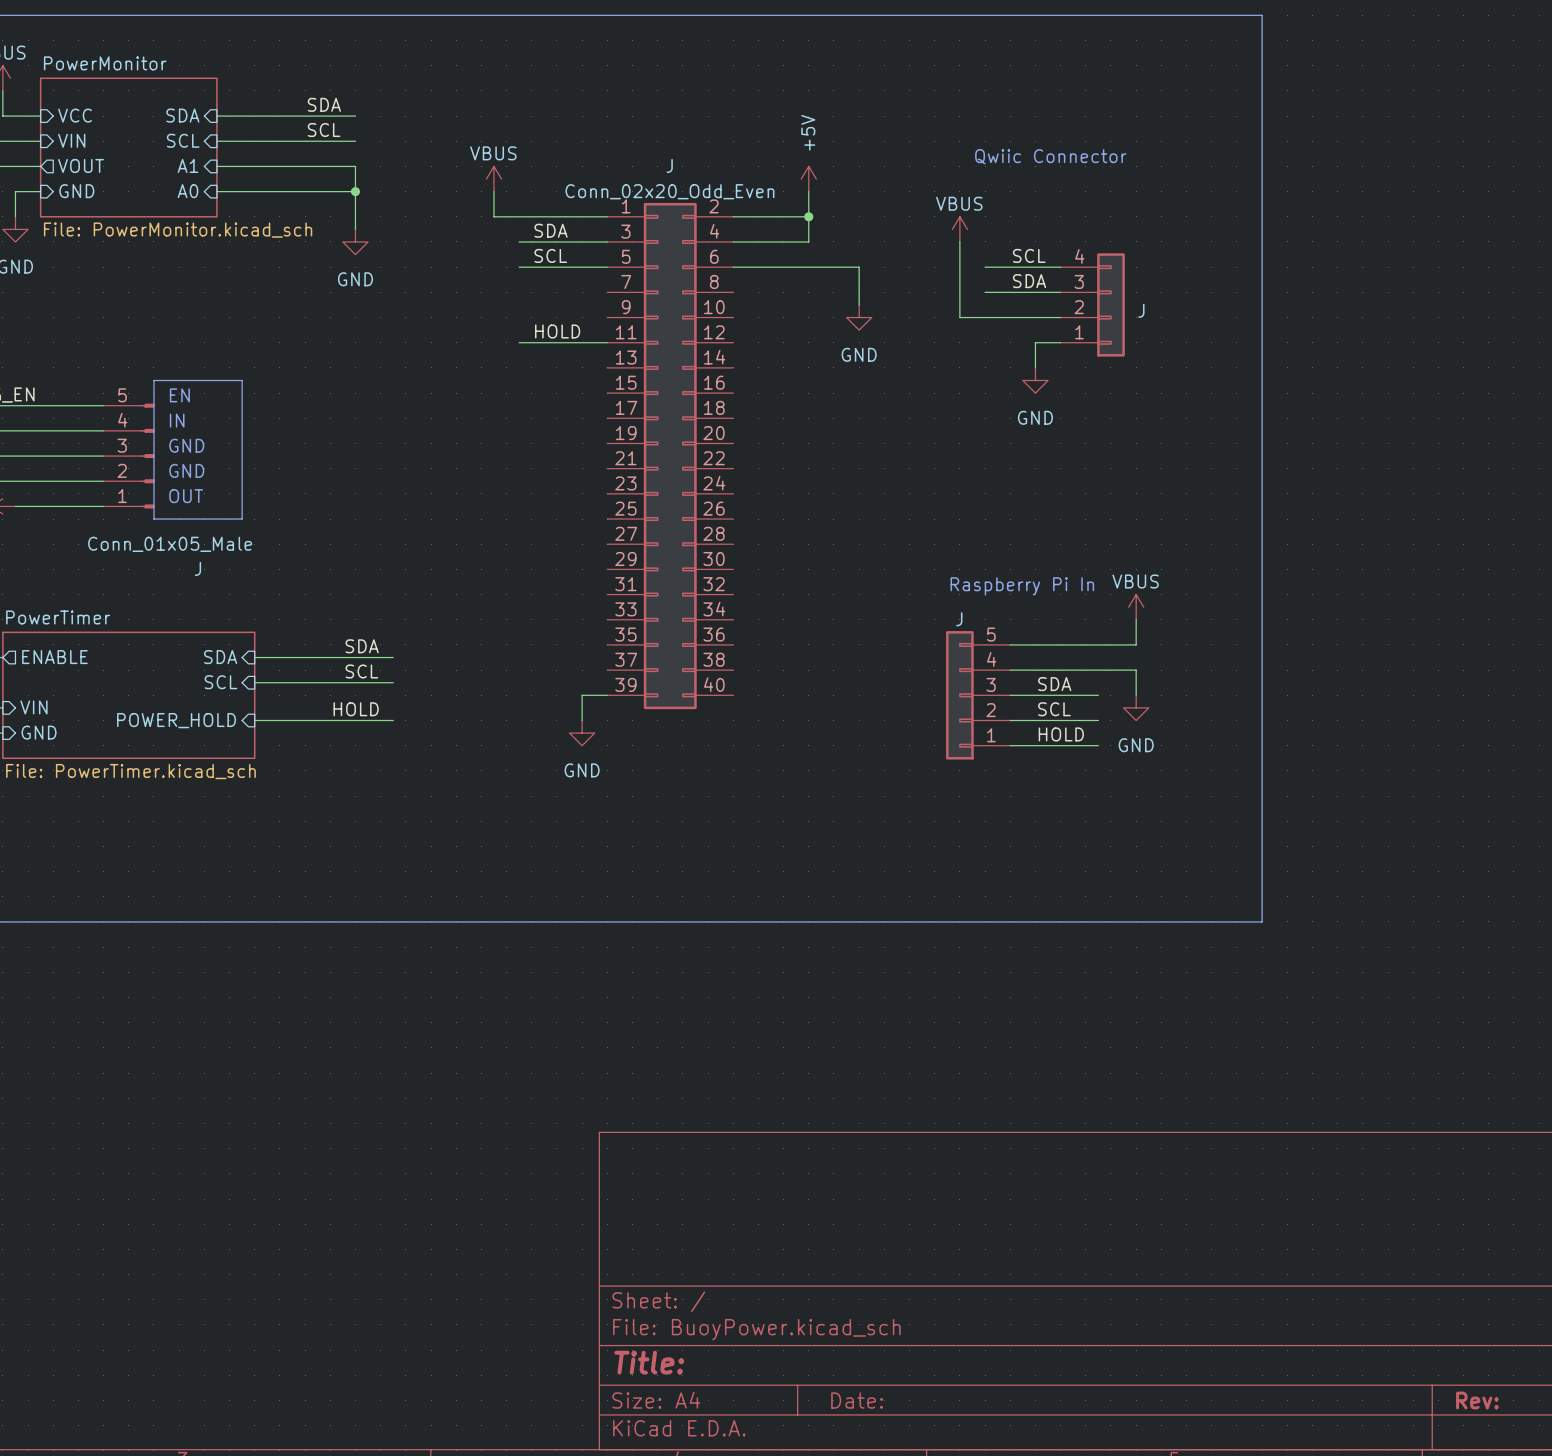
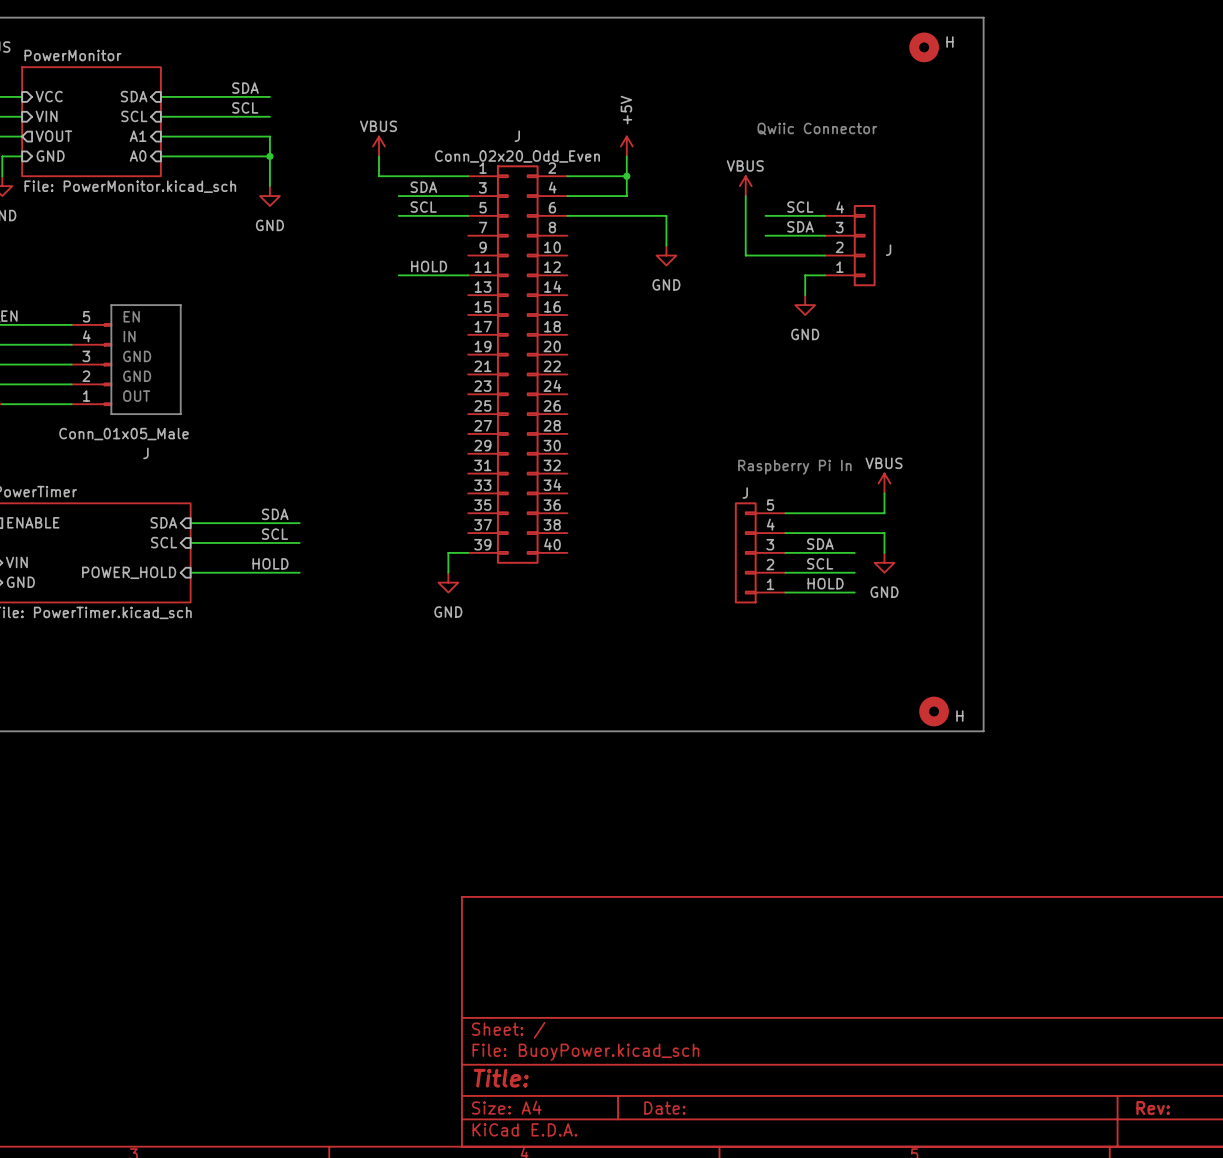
H: none -> (924, 47)
H: none -> (934, 711)

